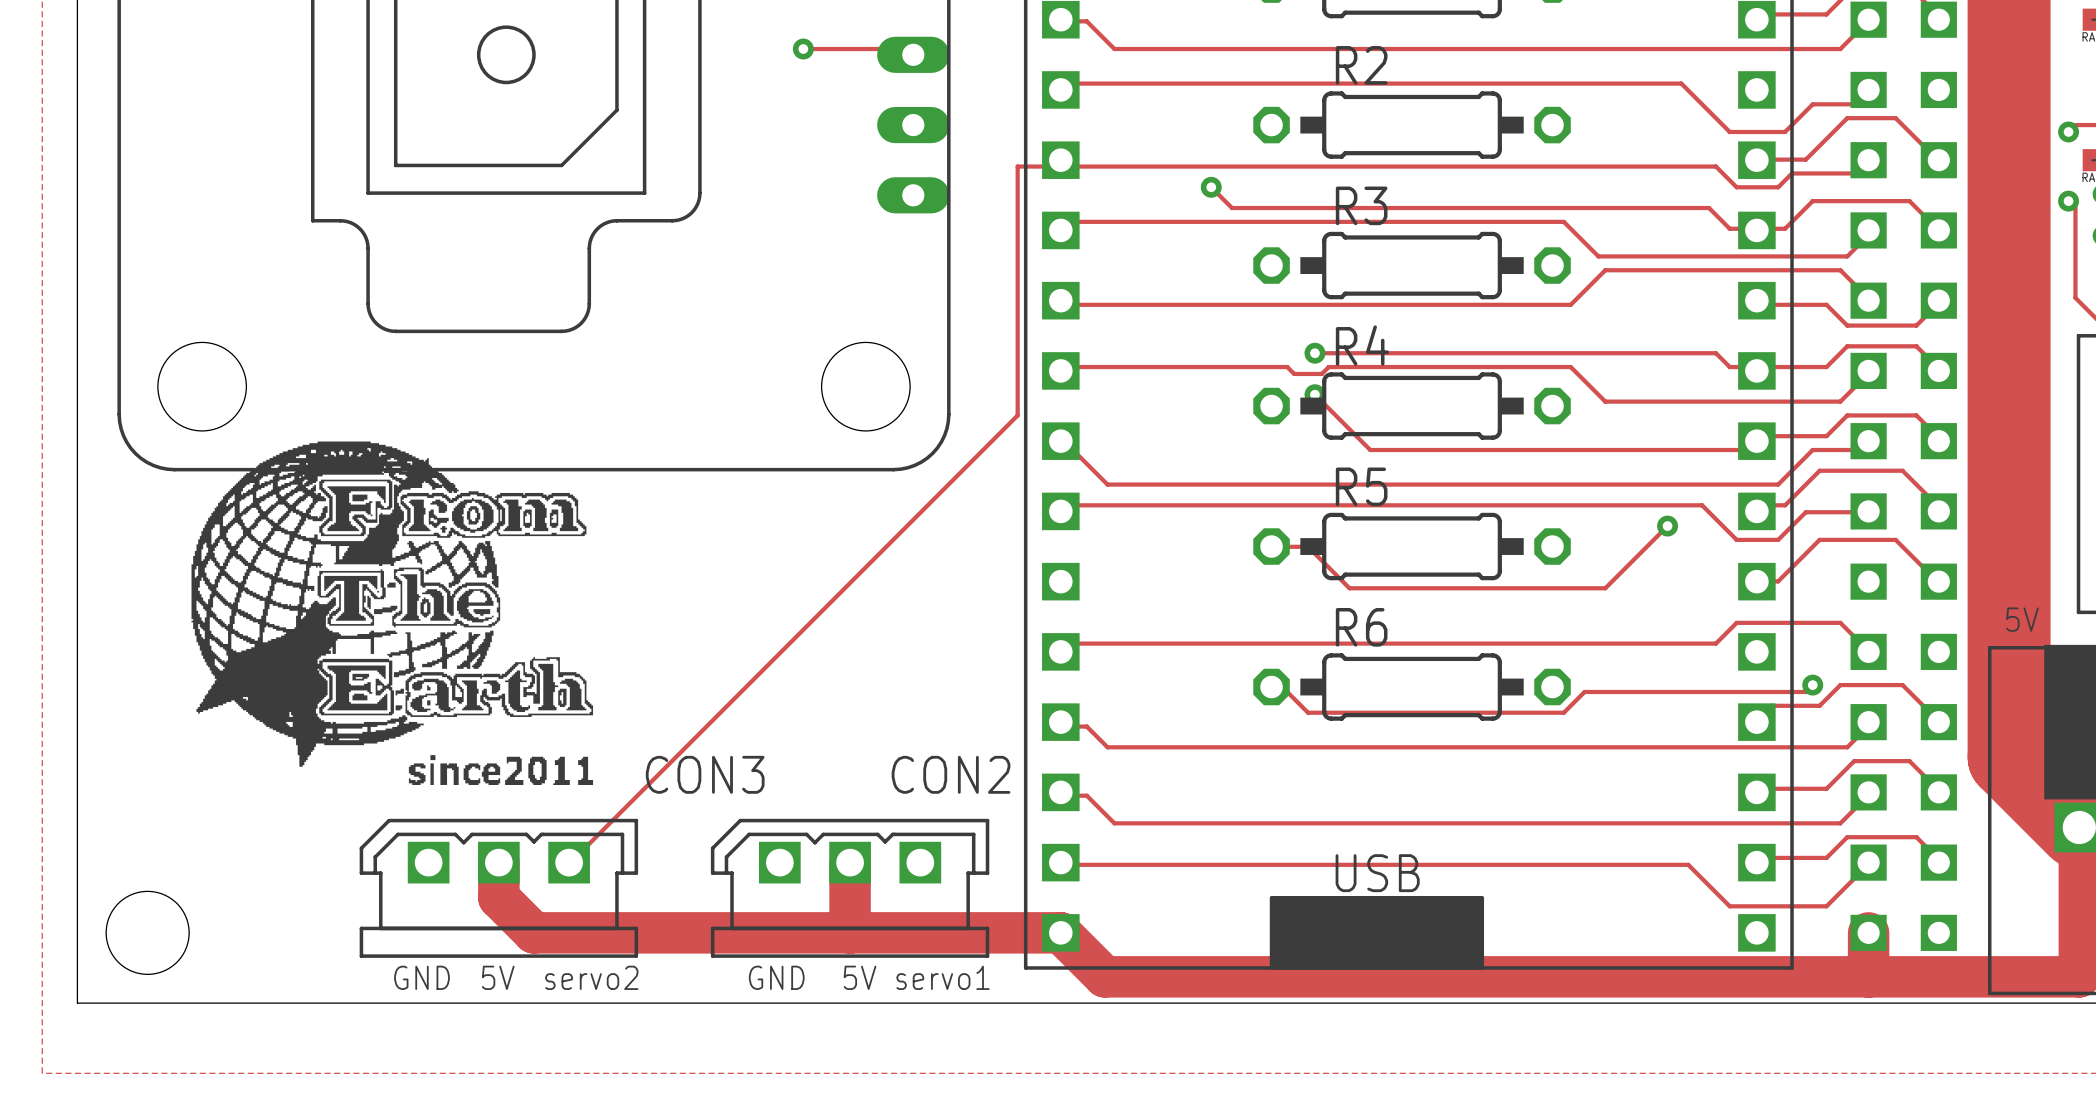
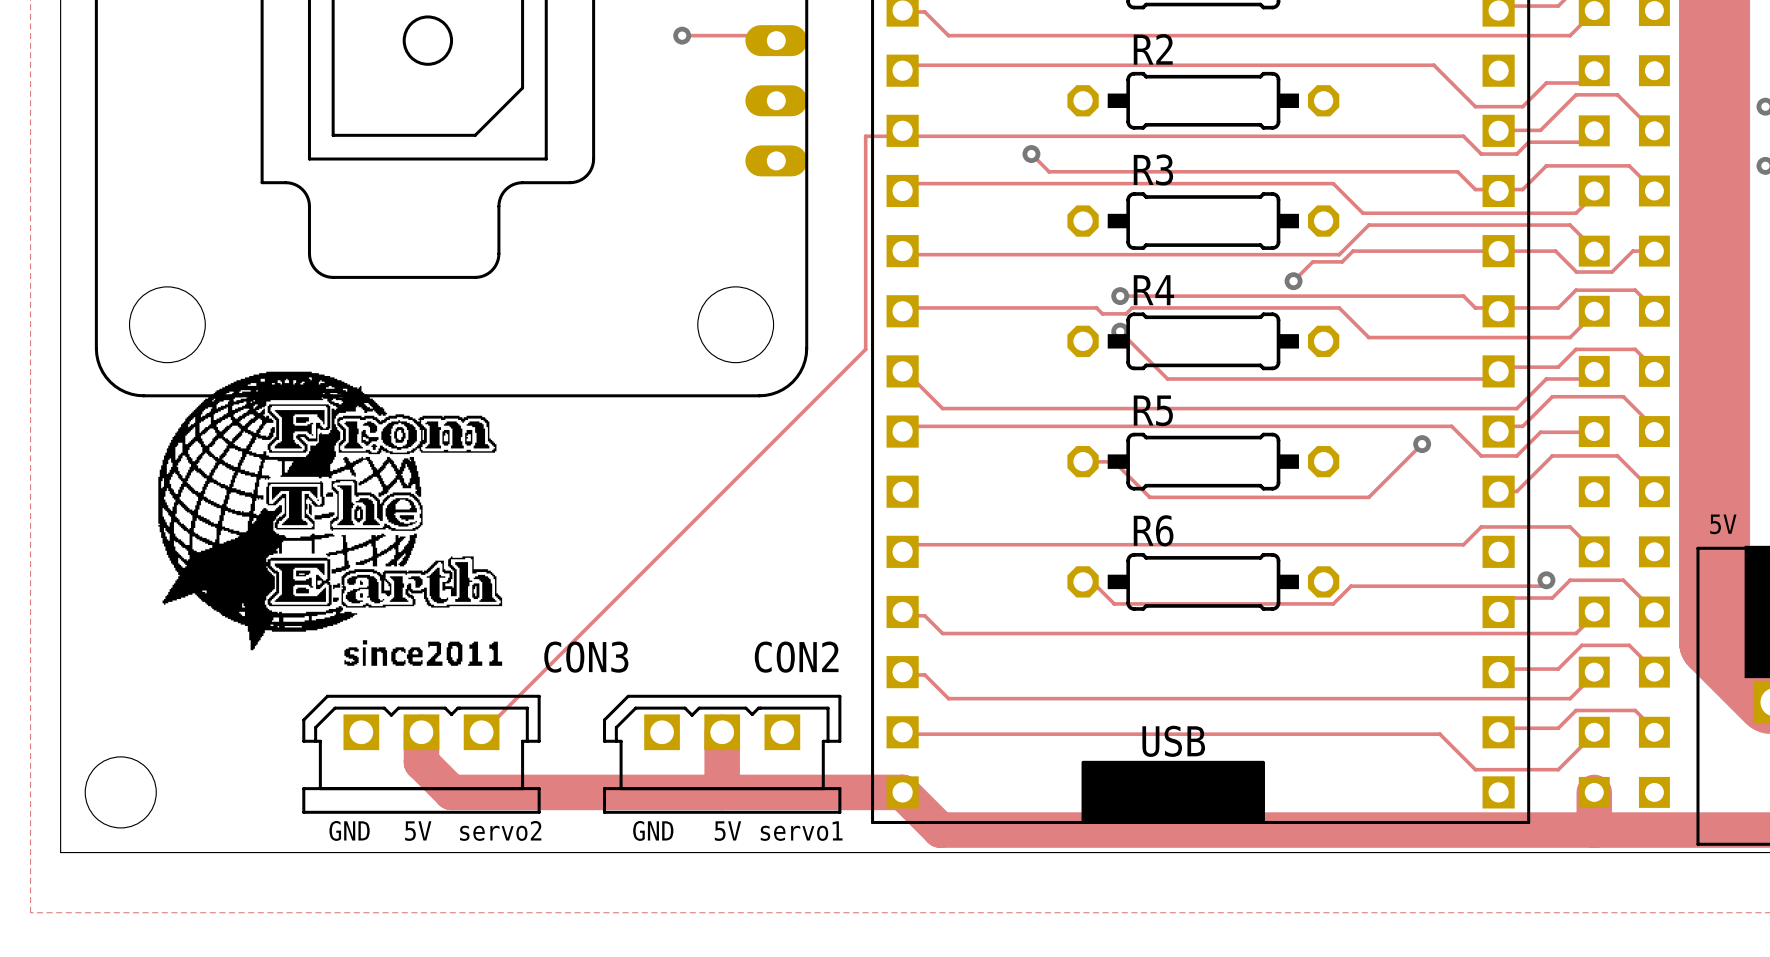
track: (1756, 300) (1757, 304) (1826, 304) (1847, 325) (1916, 325) (1937, 304) (1938, 300) -> (1293, 281) (1312, 261) (1342, 261) (1353, 251) (1555, 251) (1576, 272) (1612, 272) (1632, 251) (1654, 251)
via: none -> (1293, 281)

